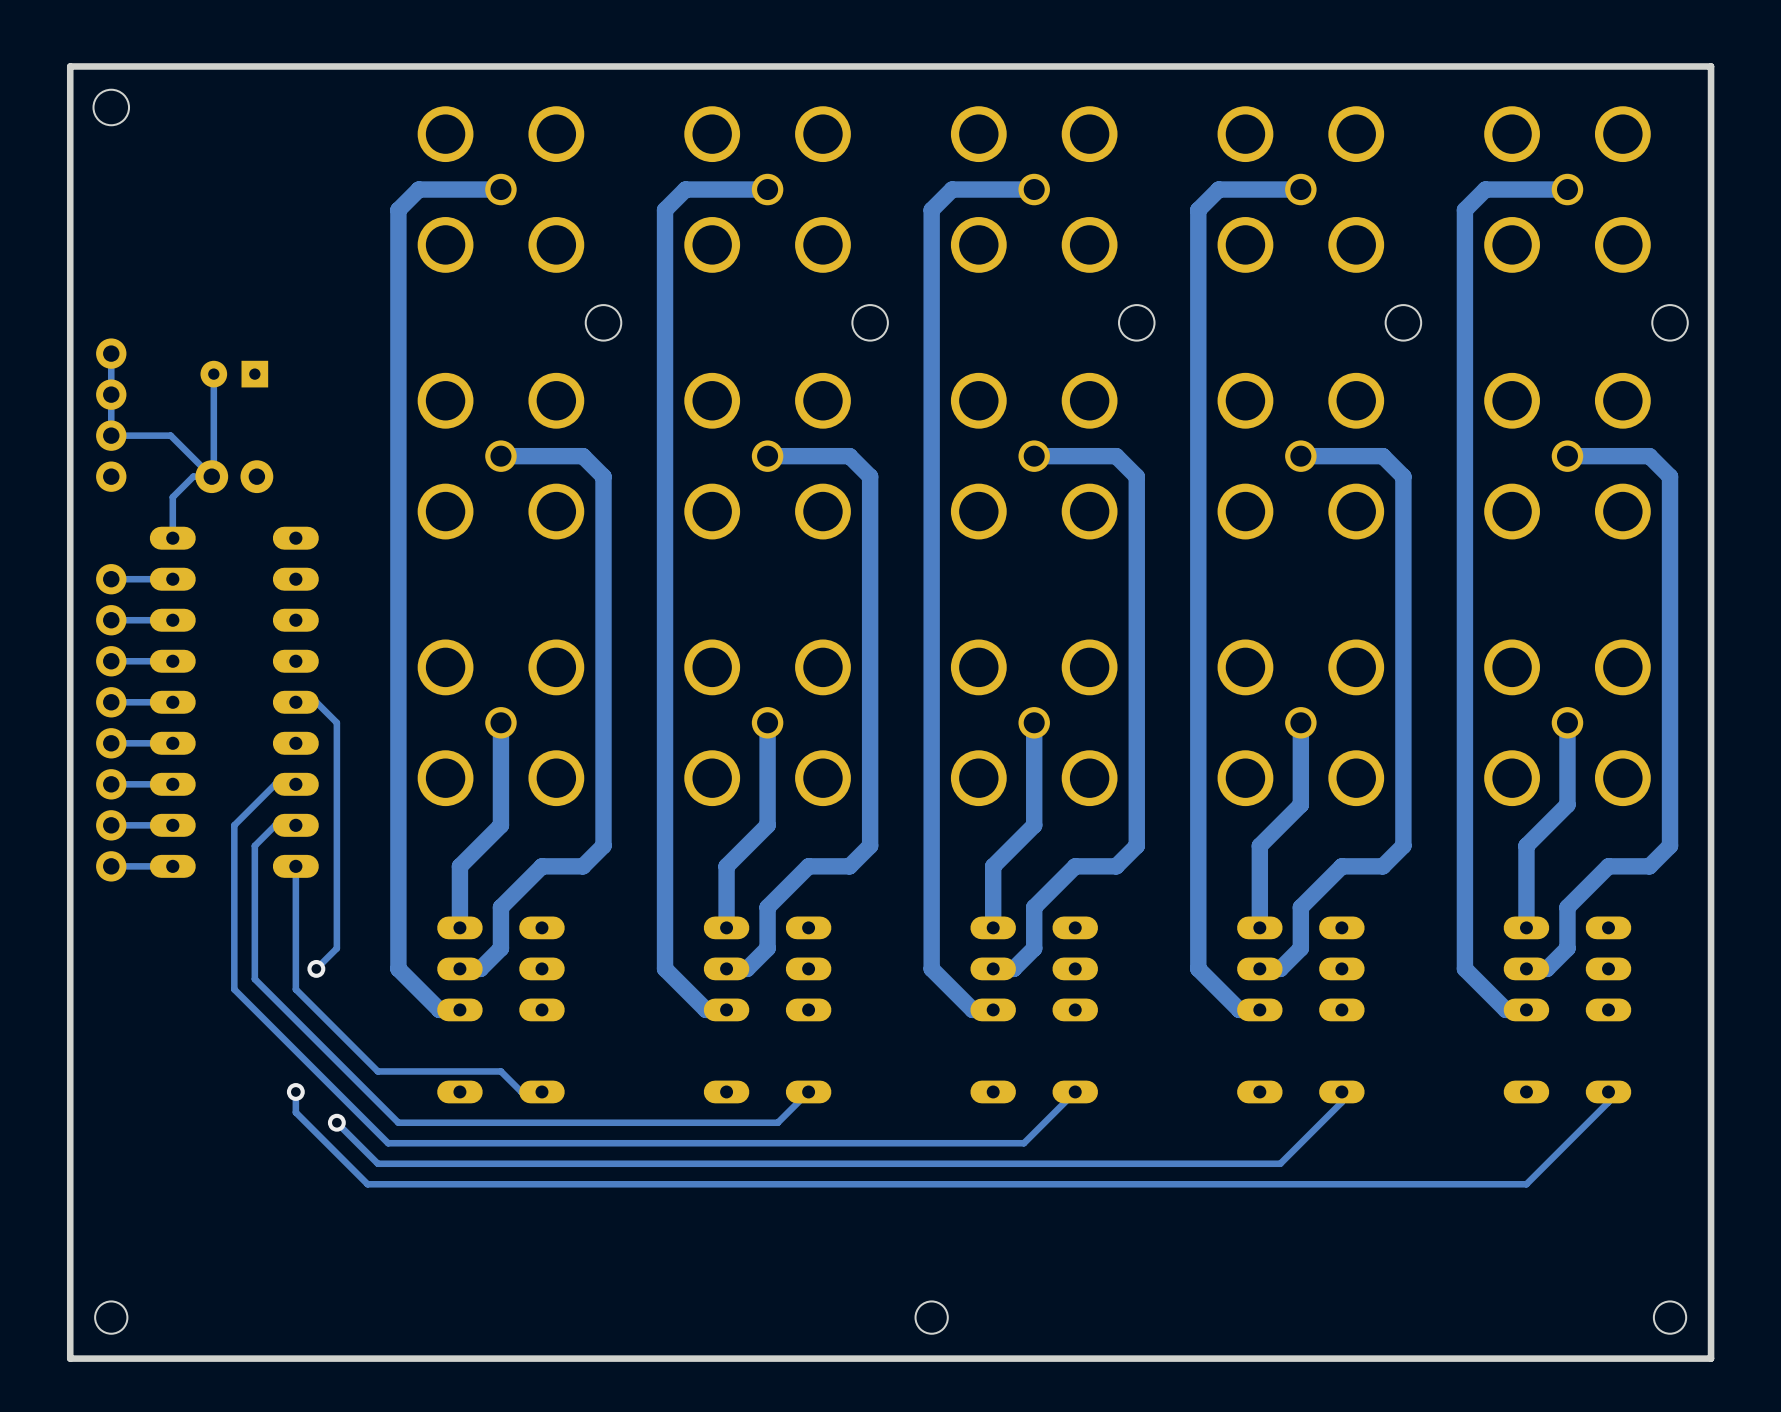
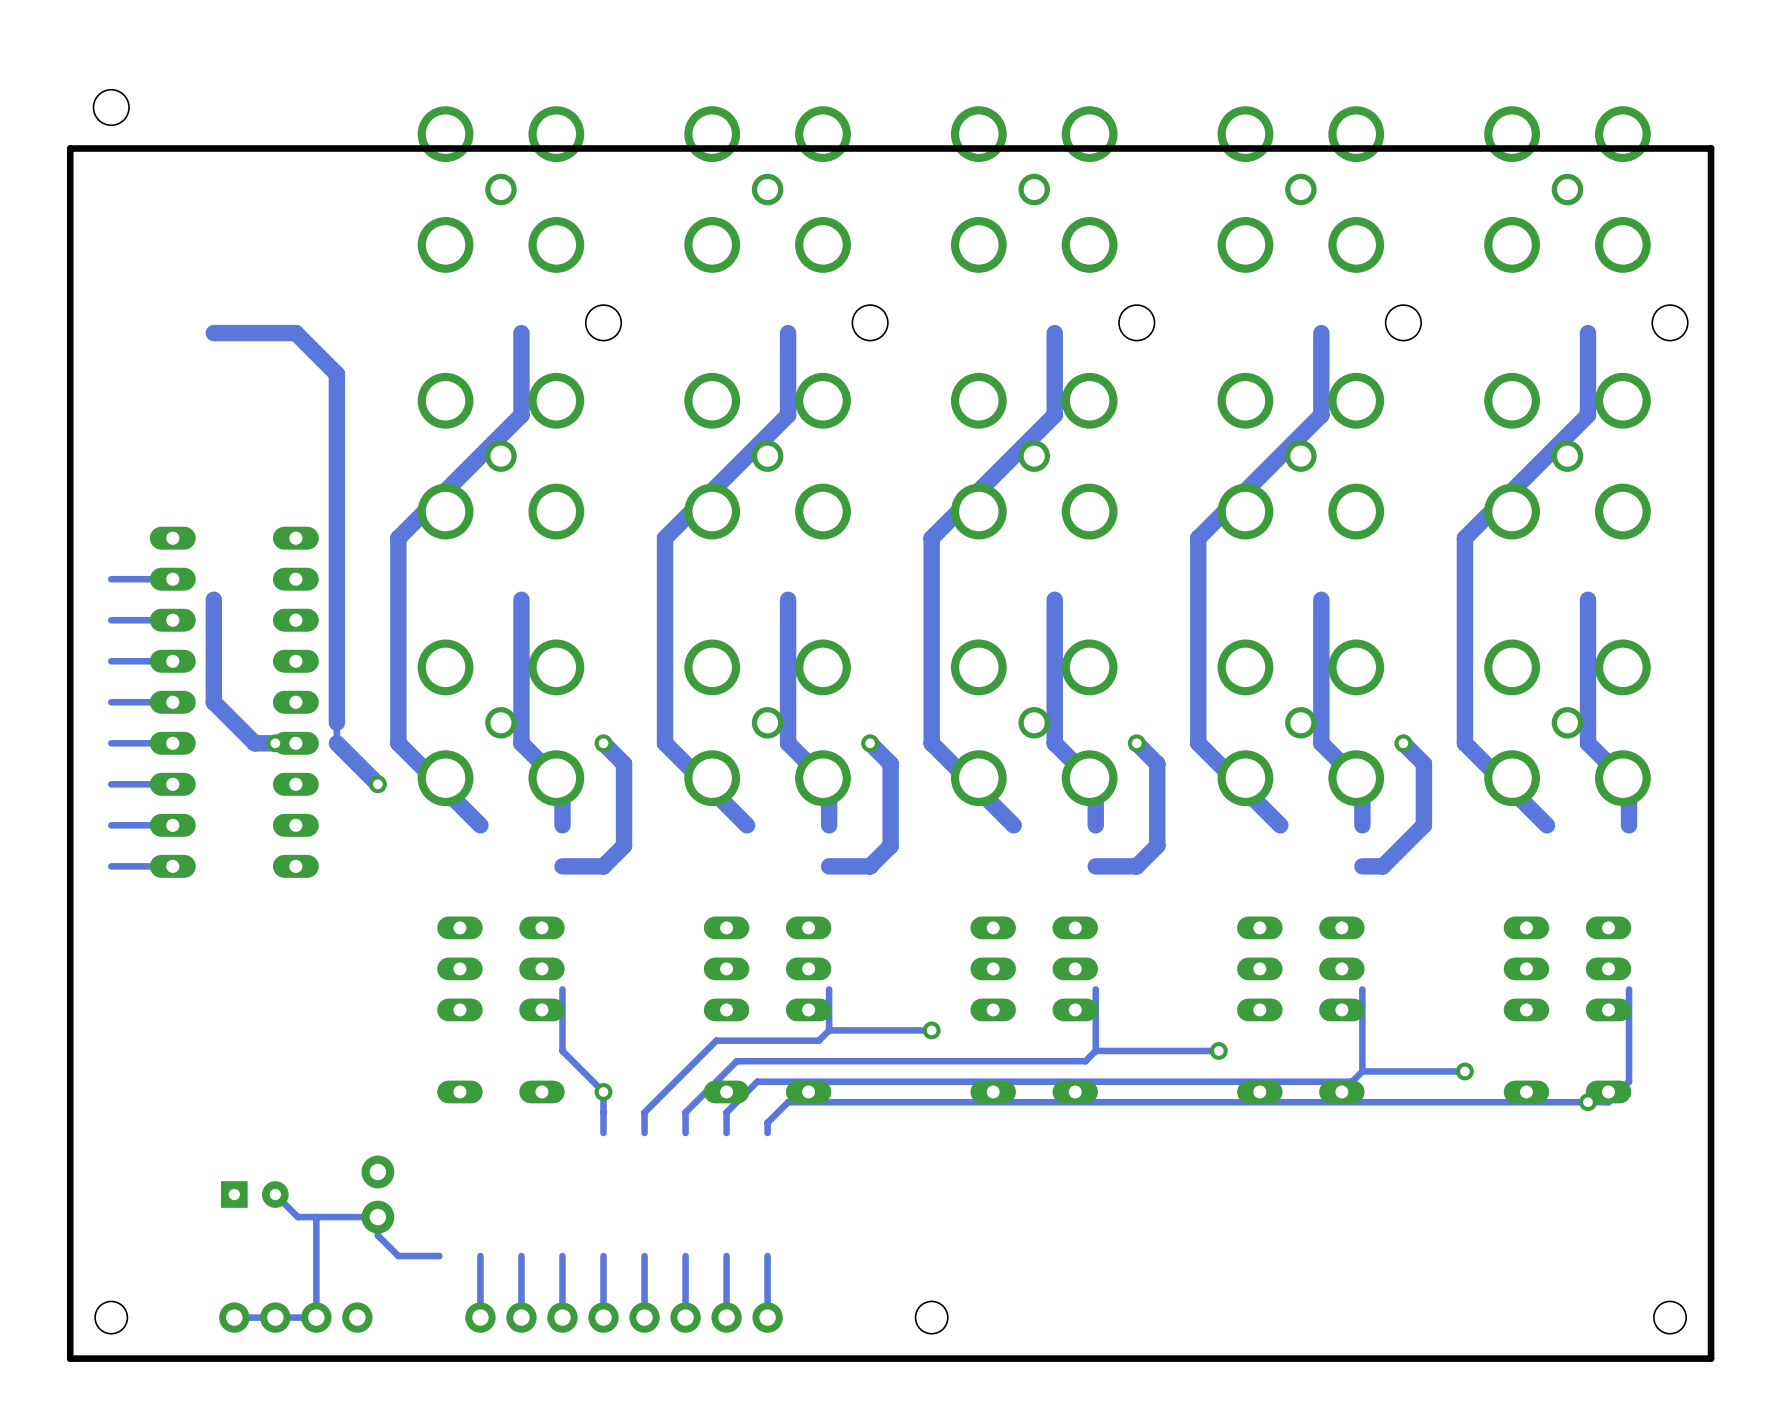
board edge: (1711, 148) (1711, 66) (70, 66) (70, 148) -> (1711, 148) (70, 148)
track: (500, 189) (418, 189) (398, 210) (398, 538) -> (521, 333) (521, 415) (398, 538)
track: (767, 189) (685, 189) (665, 210) (665, 538) -> (788, 333) (788, 415) (665, 538)
track: (1034, 189) (952, 189) (931, 210) (931, 538) -> (1054, 333) (1054, 415) (931, 538)
track: (1300, 189) (1218, 189) (1198, 210) (1198, 538) -> (1321, 333) (1321, 415) (1198, 538)
track: (1567, 189) (1485, 189) (1464, 210) (1464, 538) -> (1587, 333) (1587, 415) (1464, 538)
track: (111, 353) (111, 435) (170, 435) (211, 476) -> none
part: (111, 374) -> none
track: (213, 374) (213, 474) (211, 476) -> none
part: (234, 374) -> none
part: (111, 456) -> none
track: (500, 456) (582, 456) (603, 476) (603, 845) (582, 866) -> (603, 743) (624, 763) (624, 845) (603, 866) (582, 866)
track: (767, 456) (849, 456) (870, 476) (870, 845) (849, 866) -> (870, 743) (890, 763) (890, 845) (870, 866) (849, 866)
track: (1034, 456) (1116, 456) (1136, 476) (1136, 845) (1116, 866) -> (1136, 743) (1157, 763) (1157, 845) (1136, 866) (1116, 866)
track: (1300, 456) (1382, 456) (1403, 476) (1403, 845) -> (1403, 743) (1423, 763) (1423, 825) (1403, 845)
track: (1567, 456) (1649, 456) (1670, 476) (1670, 845) (1649, 866) (1608, 866) (1567, 907) (1567, 948) (1546, 968) (1526, 968) -> none
track: (211, 476) (193, 476) (172, 497) (172, 538) -> none
part: (234, 476) -> none
track: none -> (213, 599) (213, 702) (254, 743) (275, 743)
track: none -> (521, 599) (521, 743) (562, 784) (562, 825)
track: none -> (788, 599) (788, 743) (829, 784) (829, 825)
track: none -> (1054, 599) (1054, 743) (1095, 784) (1095, 825)
track: none -> (1321, 599) (1321, 743) (1362, 784) (1362, 825)
track: none -> (1587, 599) (1587, 743) (1629, 784) (1629, 825)
track: (295, 702) (316, 702) (336, 722) -> (213, 333) (295, 333) (336, 374) (336, 722)
part: (111, 722) -> none
track: (500, 722) (500, 825) (459, 866) (459, 927) -> none
track: (767, 722) (767, 825) (726, 866) (726, 927) -> none
track: (1034, 722) (1034, 825) (993, 866) (993, 927) -> none
track: (1300, 722) (1300, 804) (1259, 845) (1259, 927) -> none
track: (1567, 722) (1567, 804) (1526, 845) (1526, 927) -> none
via: none -> (275, 743)
track: (336, 743) (336, 948) (316, 968) -> (336, 743) (377, 784)
track: (398, 743) (398, 968) (439, 1009) (459, 1009) -> (398, 743) (480, 825)
via: none -> (603, 743)
track: (665, 743) (665, 968) (706, 1009) (726, 1009) -> (665, 743) (747, 825)
via: none -> (870, 743)
track: (931, 743) (931, 968) (972, 1009) (993, 1009) -> (931, 743) (1013, 825)
via: none -> (1136, 743)
track: (1198, 743) (1198, 968) (1239, 1009) (1259, 1009) -> (1198, 743) (1280, 825)
via: none -> (1403, 743)
track: (1464, 743) (1464, 968) (1505, 1009) (1526, 1009) -> (1464, 743) (1546, 825)
track: (295, 784) (275, 784) (234, 825) (234, 989) (388, 1143) (1023, 1143) (1075, 1091) -> none
via: none -> (377, 784)
track: (295, 825) (275, 825) (254, 845) (254, 979) (398, 1122) (777, 1122) (808, 1091) -> none
track: (295, 866) (295, 989) (377, 1071) (500, 1071) (521, 1091) (541, 1091) -> none
track: (562, 866) (541, 866) (500, 907) (500, 948) (480, 968) (459, 968) -> none
track: (829, 866) (808, 866) (767, 907) (767, 948) (747, 968) (726, 968) -> none
track: (1095, 866) (1075, 866) (1034, 907) (1034, 948) (1013, 968) (993, 968) -> none
track: (1362, 866) (1341, 866) (1300, 907) (1300, 948) (1280, 968) (1259, 968) -> none
via: (316, 968) -> none
track: none -> (562, 989) (562, 1050) (603, 1091) (603, 1132)
track: none -> (829, 989) (829, 1030)
track: none -> (1095, 989) (1095, 1050)
track: none -> (1362, 989) (1362, 1071)
track: none -> (1629, 989) (1629, 1081) (1608, 1102) (788, 1102) (767, 1122) (767, 1132)
track: none -> (829, 1030) (818, 1040) (716, 1040) (644, 1112) (644, 1132)
track: none -> (931, 1030) (829, 1030)
via: none -> (931, 1030)
track: none -> (1095, 1050) (1085, 1061) (736, 1061) (685, 1112) (685, 1132)
track: none -> (1218, 1050) (1095, 1050)
via: none -> (1218, 1050)
track: none -> (1362, 1071) (1352, 1081) (757, 1081) (726, 1112) (726, 1132)
track: none -> (1464, 1071) (1362, 1071)
via: none -> (1464, 1071)
via: (295, 1091) -> none
via: none -> (603, 1091)
track: (1341, 1091) (1341, 1102) (1280, 1163) (377, 1163) (336, 1122) -> none
track: (1608, 1091) (1608, 1102) (1526, 1184) (367, 1184) (295, 1112) (295, 1091) -> none
via: none -> (1587, 1102)
via: (336, 1122) -> none
part: none -> (254, 1194)
track: none -> (275, 1194) (297, 1217) (377, 1217) (377, 1235) (398, 1256) (439, 1256)
part: none -> (377, 1194)
track: none -> (316, 1217) (316, 1317) (234, 1317)
track: none -> (480, 1256) (480, 1317)
track: none -> (521, 1256) (521, 1317)
track: none -> (562, 1256) (562, 1317)
track: none -> (603, 1256) (603, 1317)
track: none -> (644, 1256) (644, 1317)
track: none -> (685, 1256) (685, 1317)
track: none -> (726, 1256) (726, 1317)
track: none -> (767, 1256) (767, 1317)
part: none -> (254, 1317)
part: none -> (336, 1317)
part: none -> (624, 1317)

